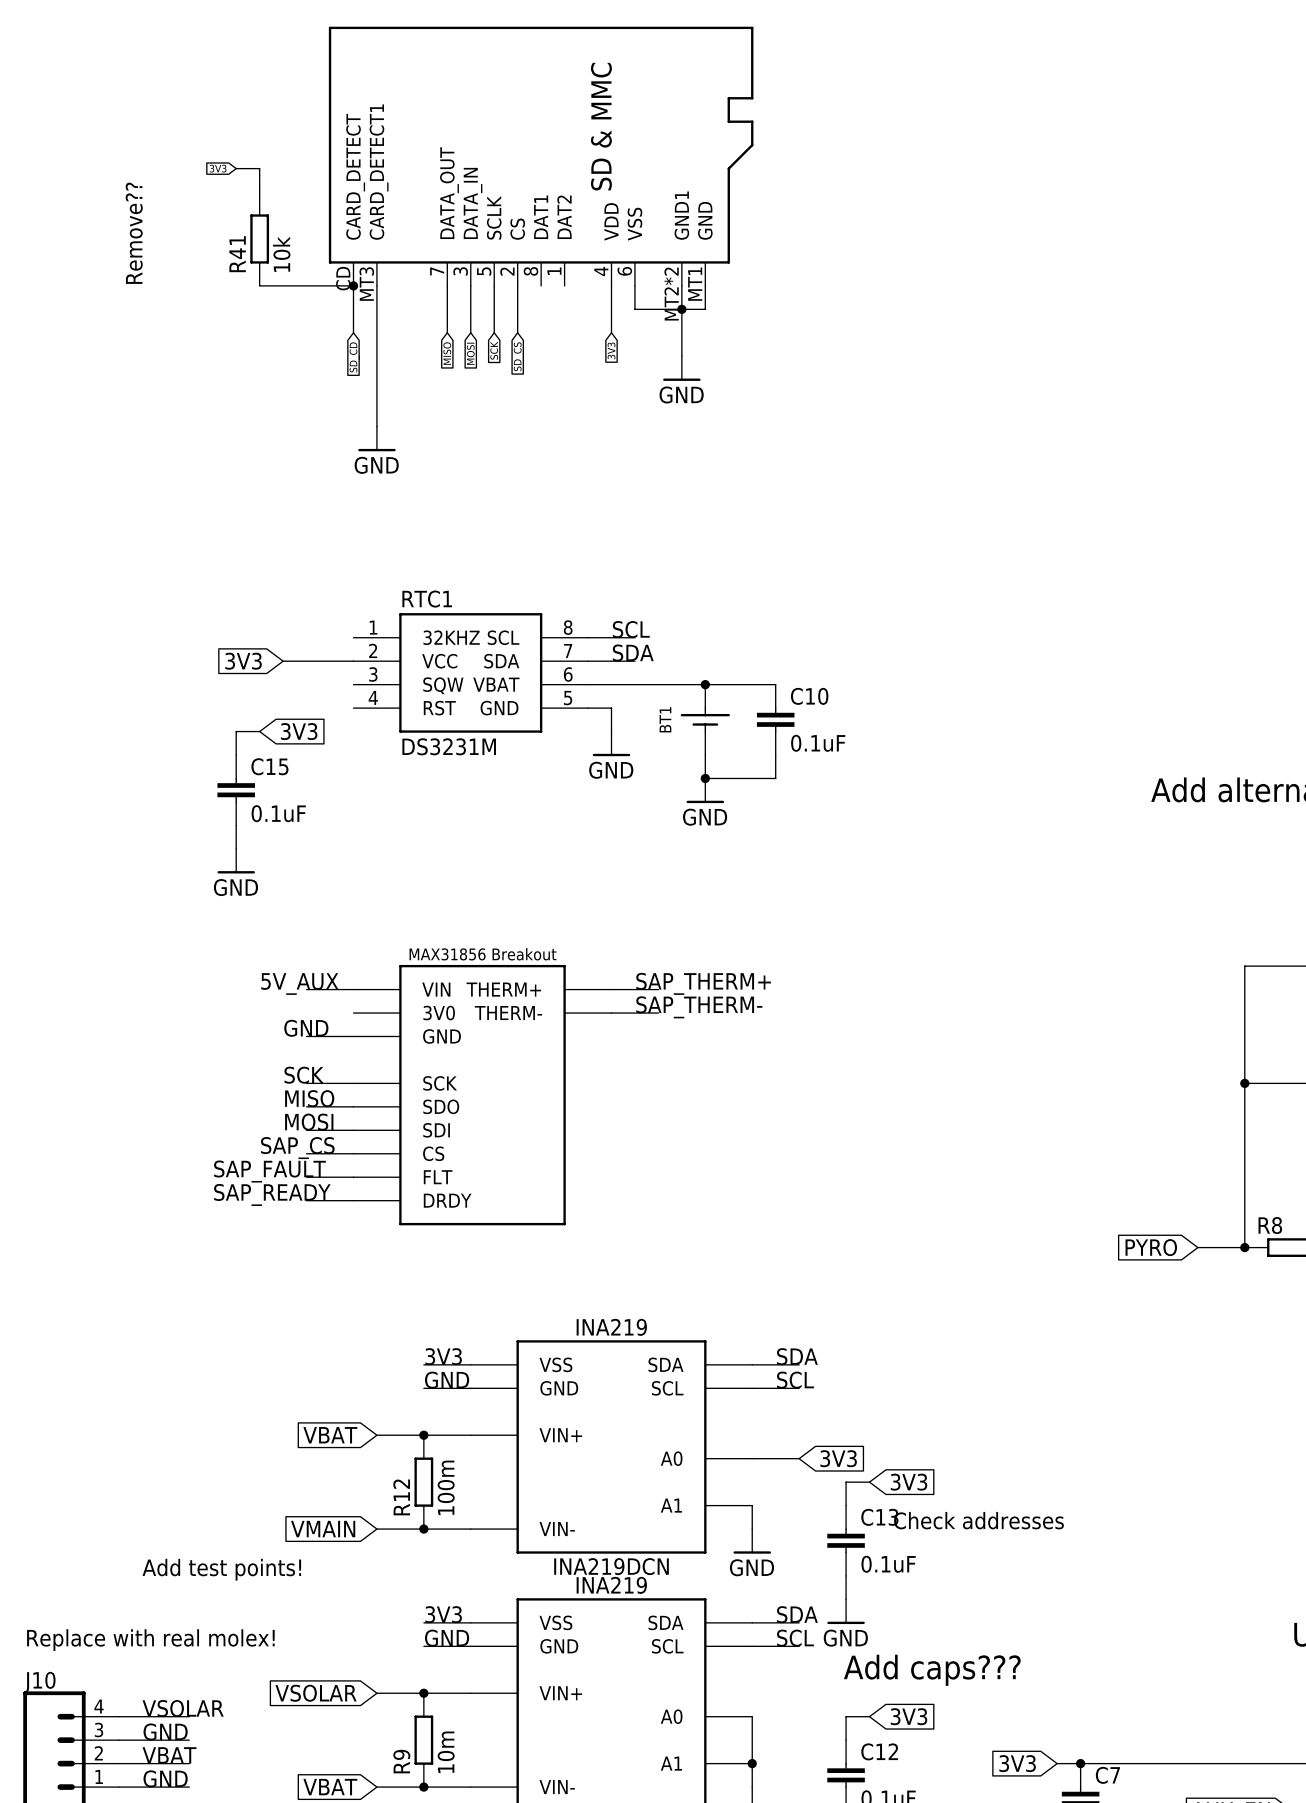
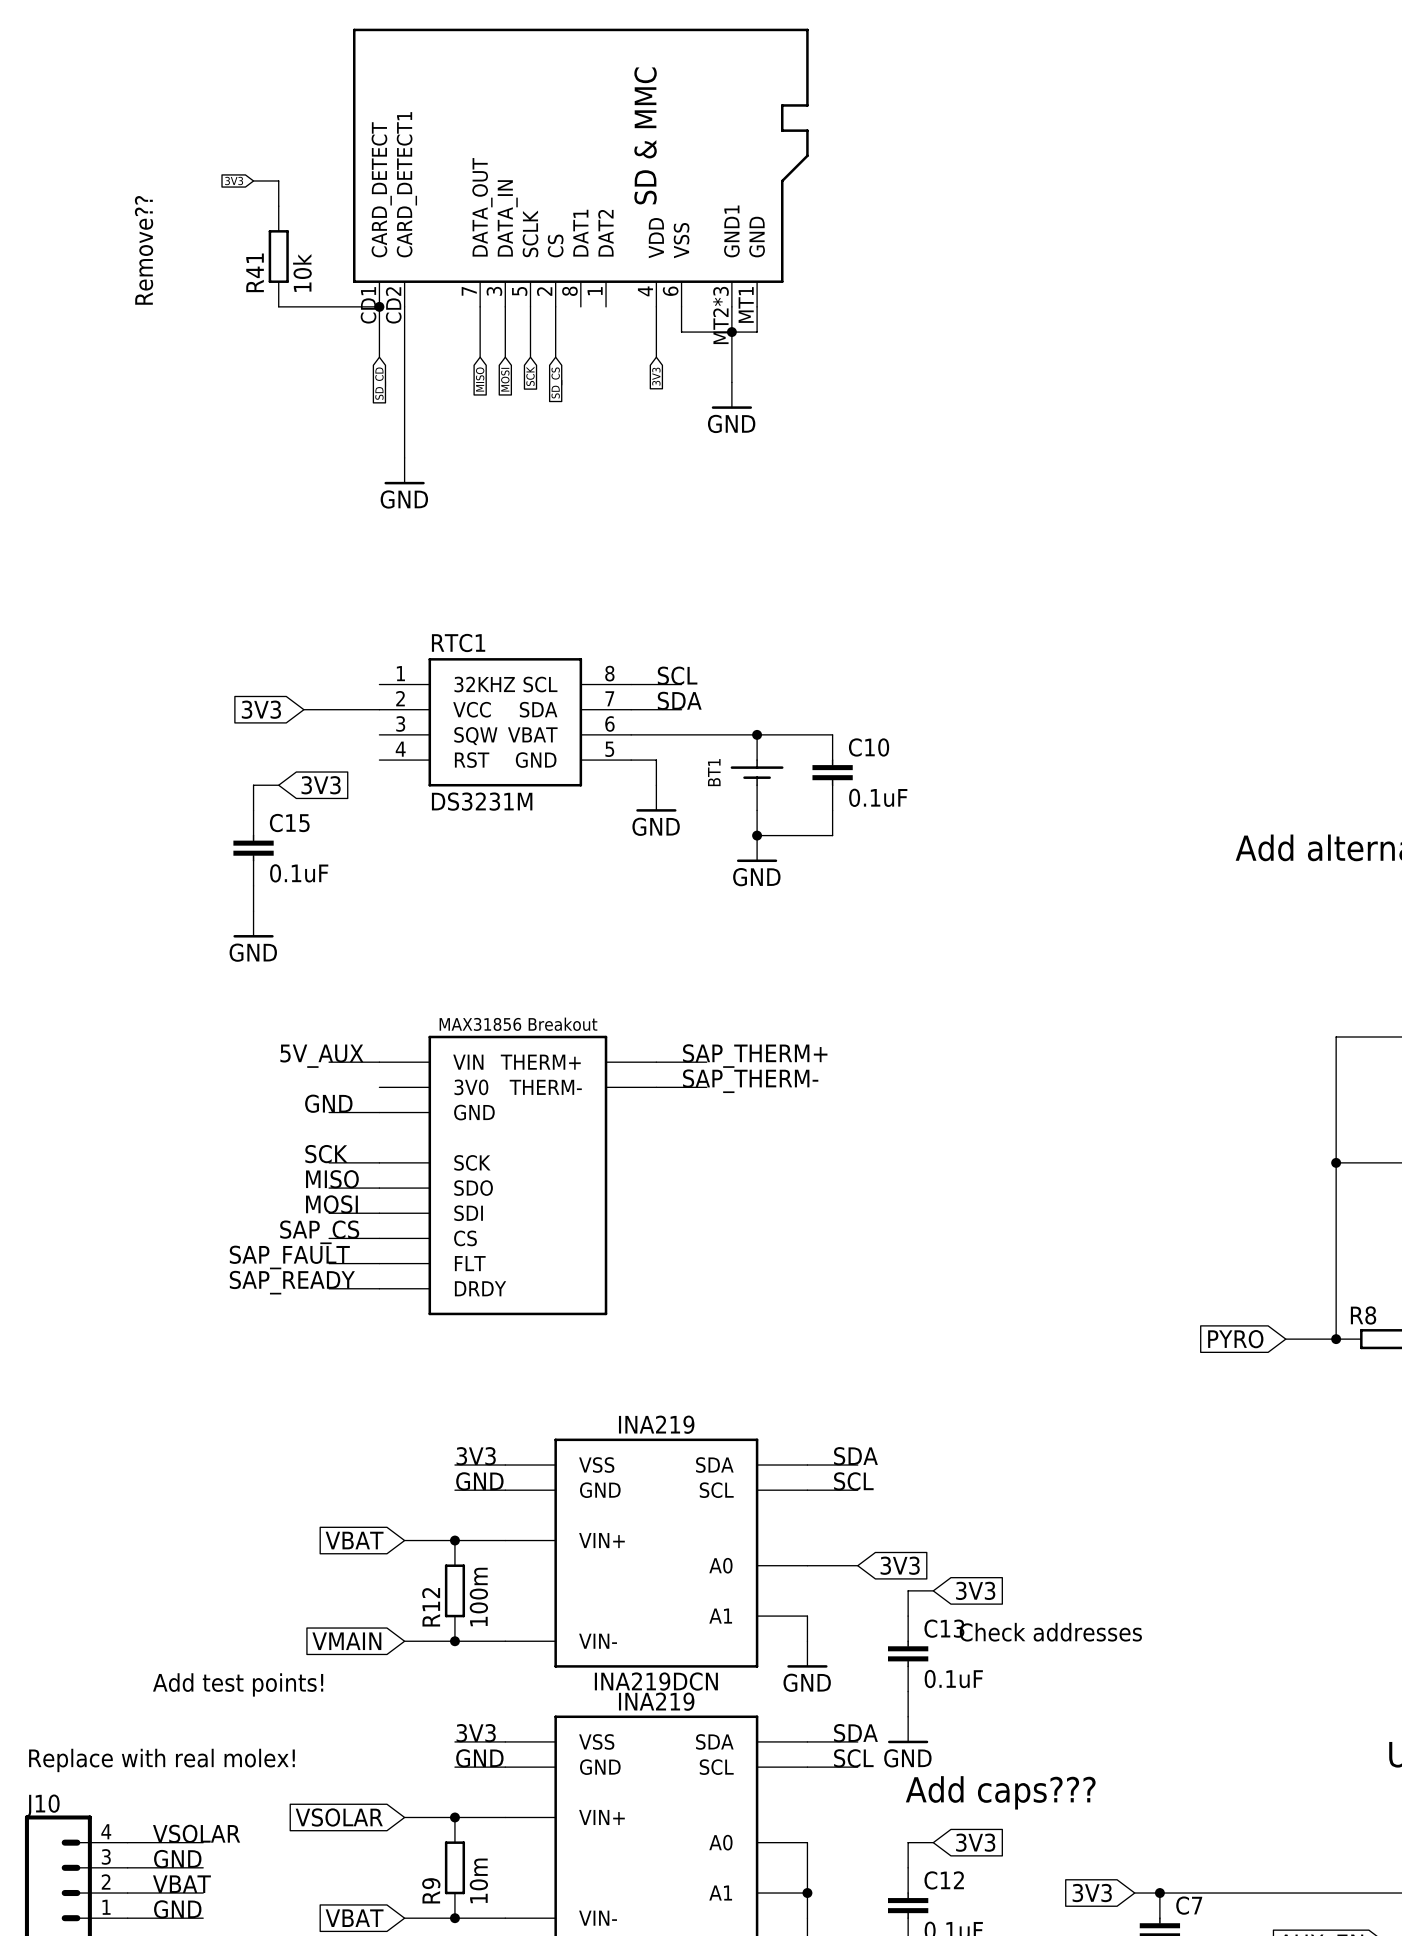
part pin number: CD (343, 278) -> CD1 (368, 305)
part pin number: MT3 (366, 284) -> CD2 (393, 305)
part pin number: MT2*2 (671, 294) -> MT2*3 (721, 315)

